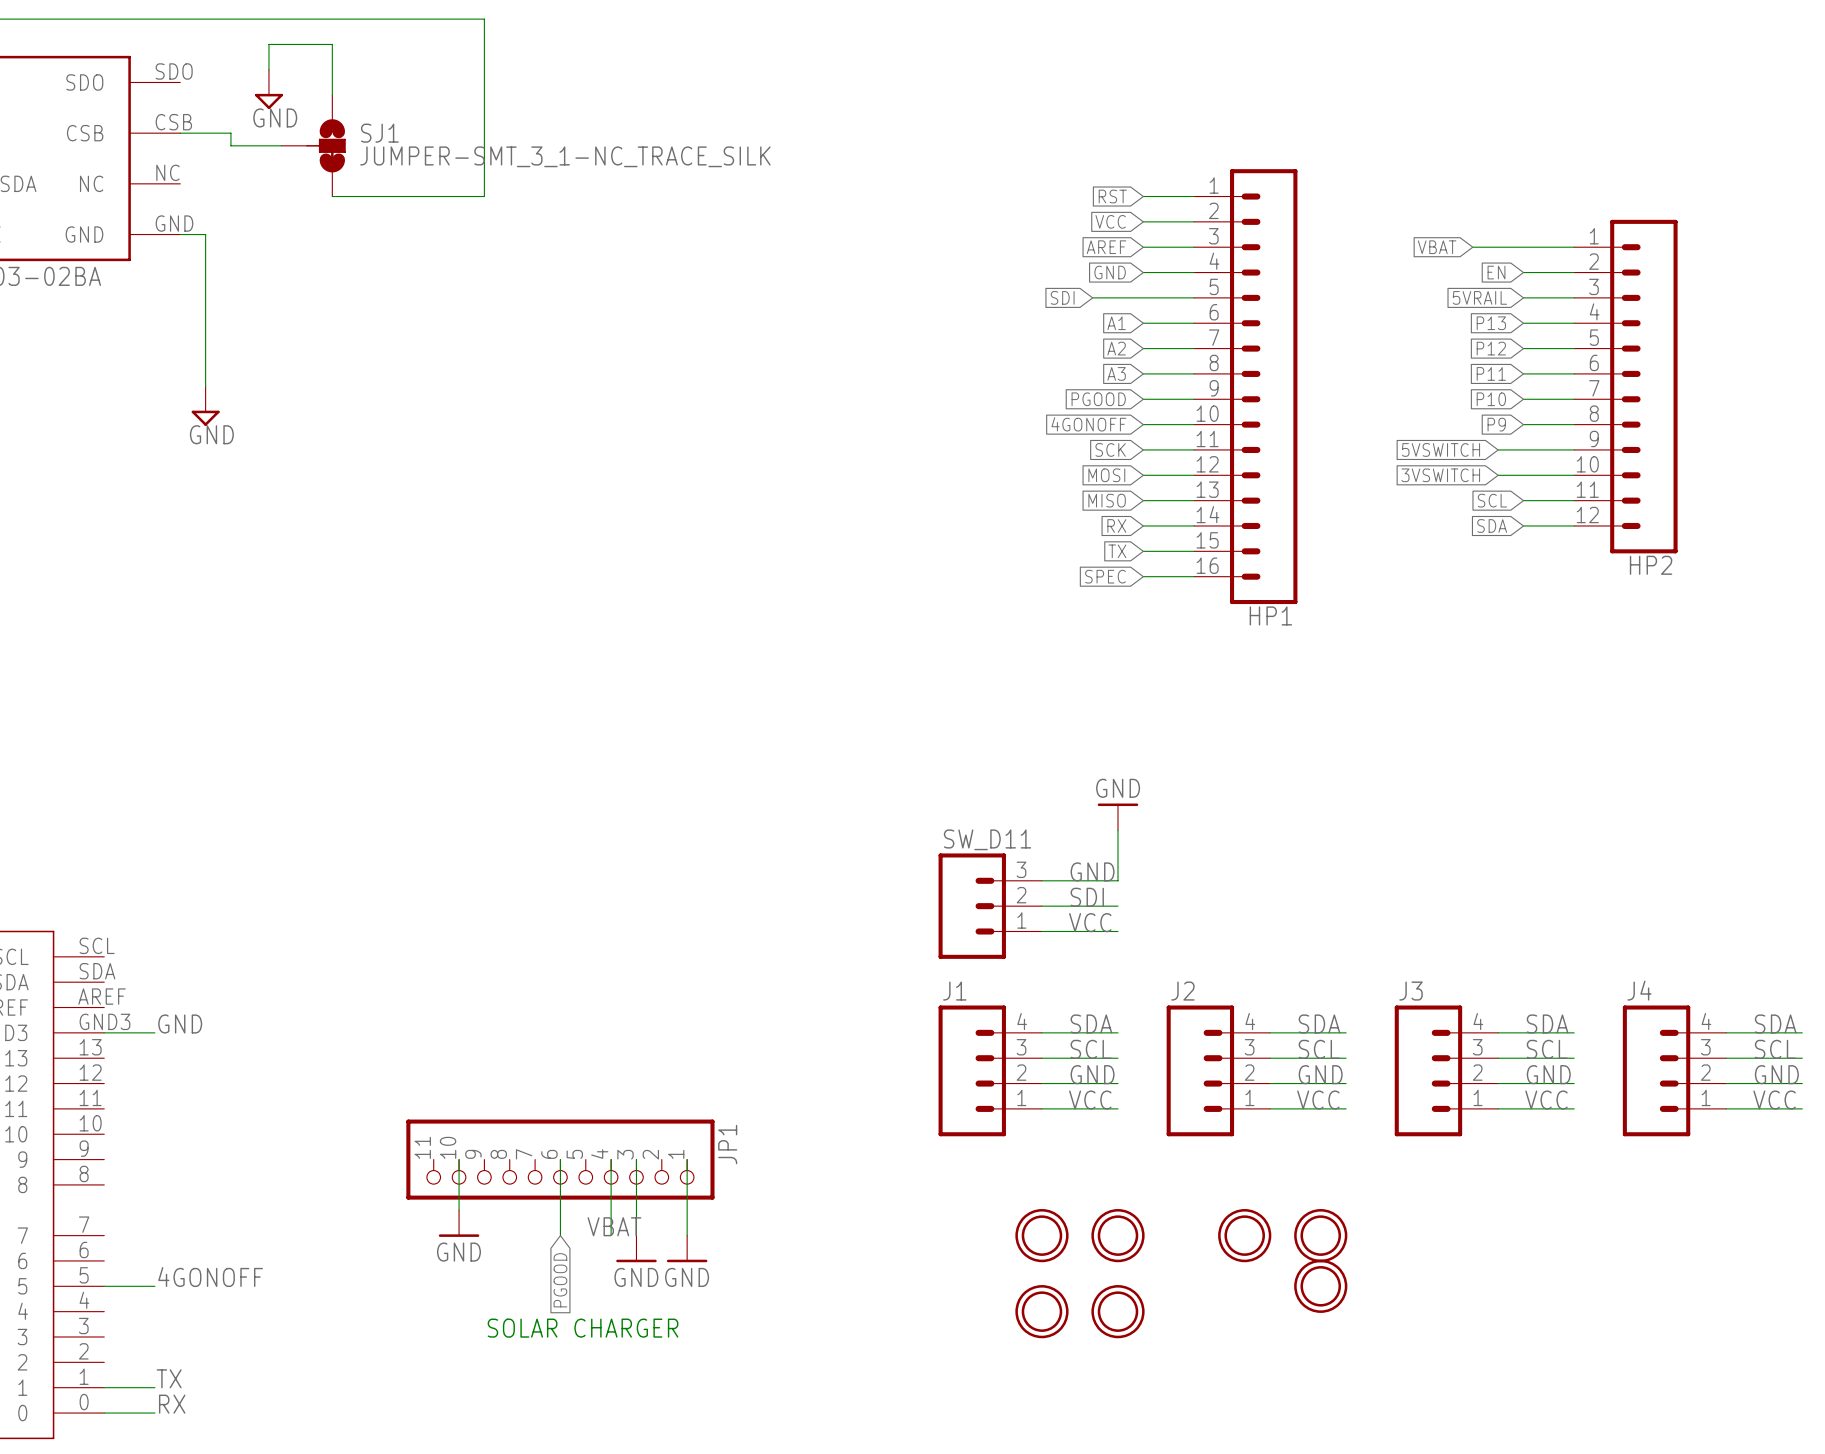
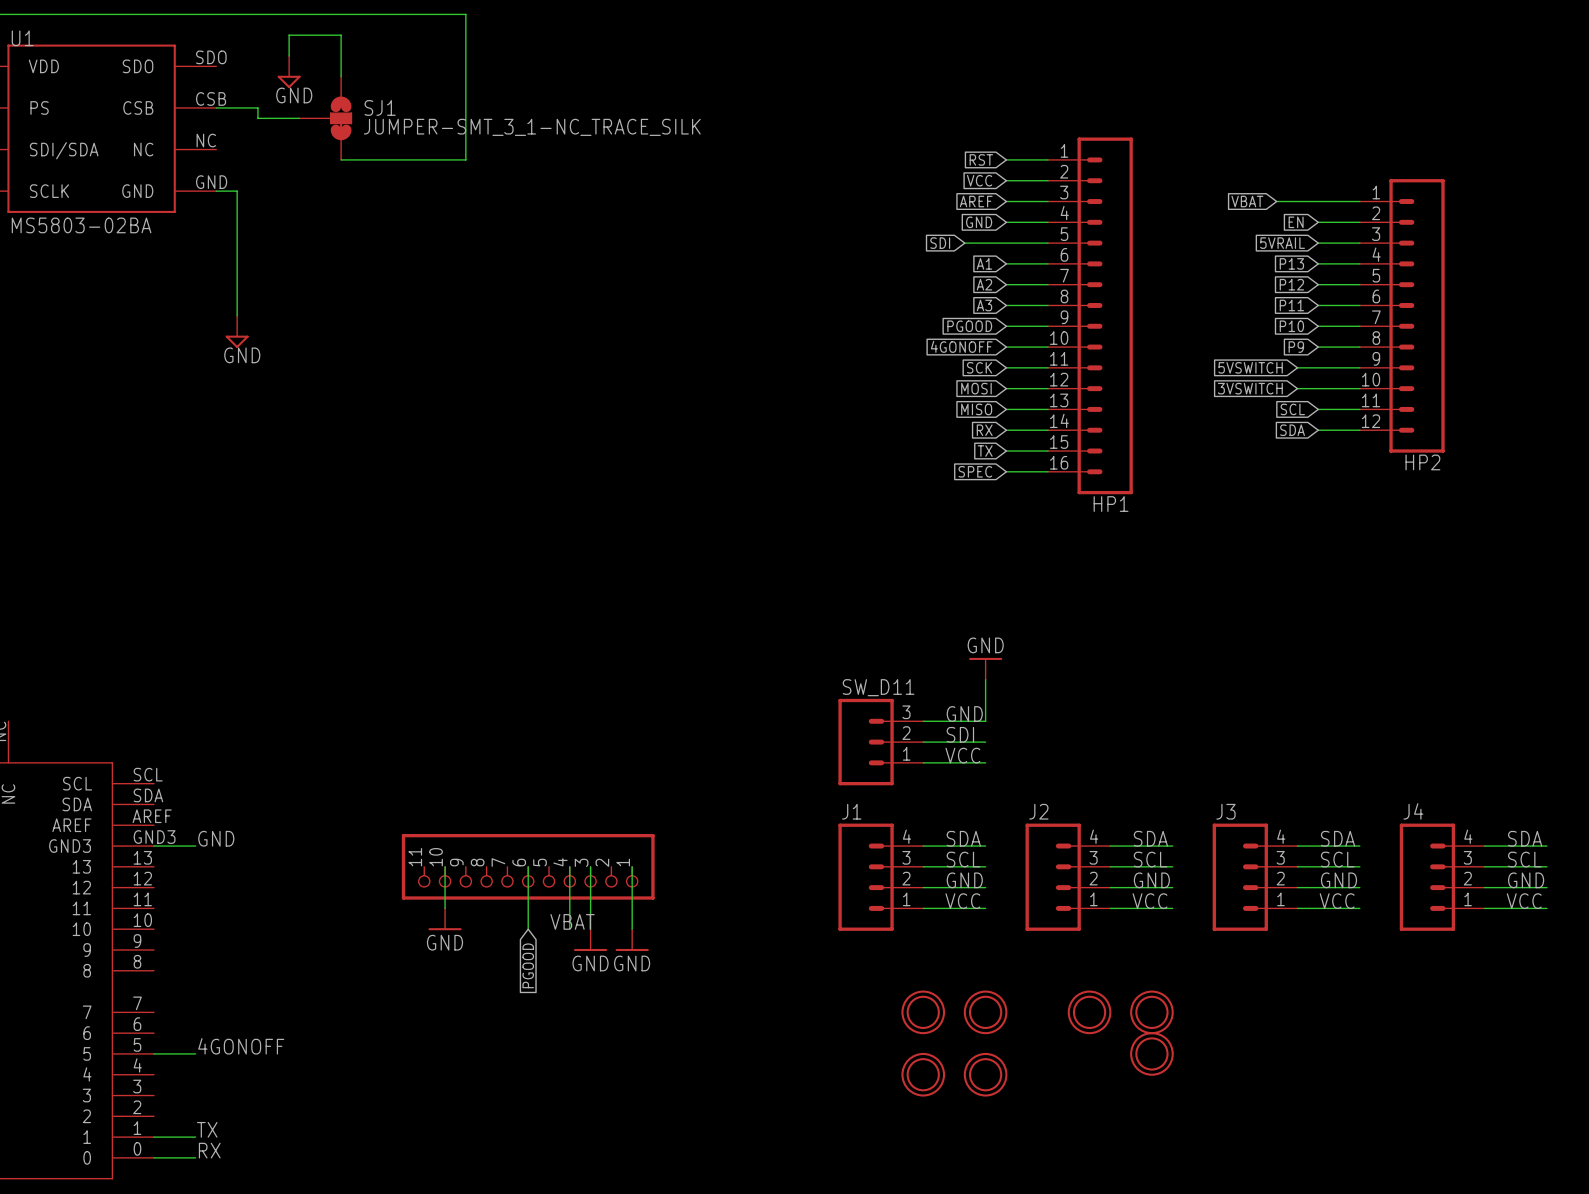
part: none -> (528, 866)
power symbol: none -> GND (445, 919)
power symbol: none -> GND (590, 940)
power symbol: none -> GND (632, 940)
wire: (459, 1159) (459, 1210) -> (445, 866) (445, 908)
wire: (560, 1159) (560, 1235) -> (528, 866) (528, 929)
JP1: (560, 1159) -> none
wire: (611, 1159) (611, 1235) -> (569, 866) (569, 929)
wire: (636, 1159) (636, 1235) -> (590, 866) (590, 929)
wire: (687, 1159) (687, 1235) -> (632, 866) (632, 929)
power symbol: GND (459, 1223) -> none
label position: VBAT (614, 1226) -> VBAT (572, 921)
power symbol: GND (636, 1248) -> none
power symbol: GND (687, 1248) -> none
global label position: PGOOD (560, 1280) -> PGOOD (528, 965)
text: SOLAR CHARGER (583, 1328) -> none

